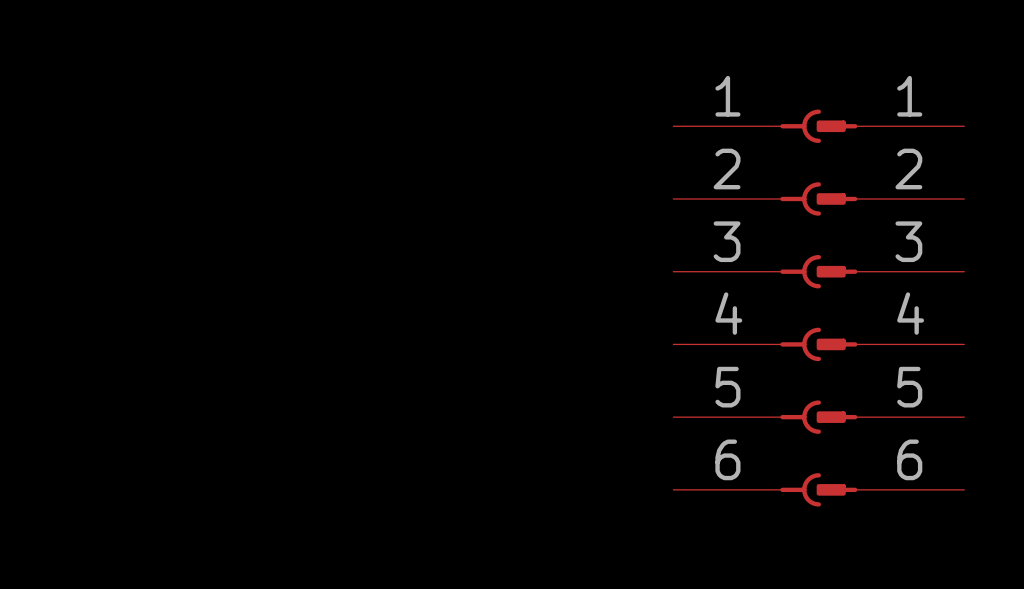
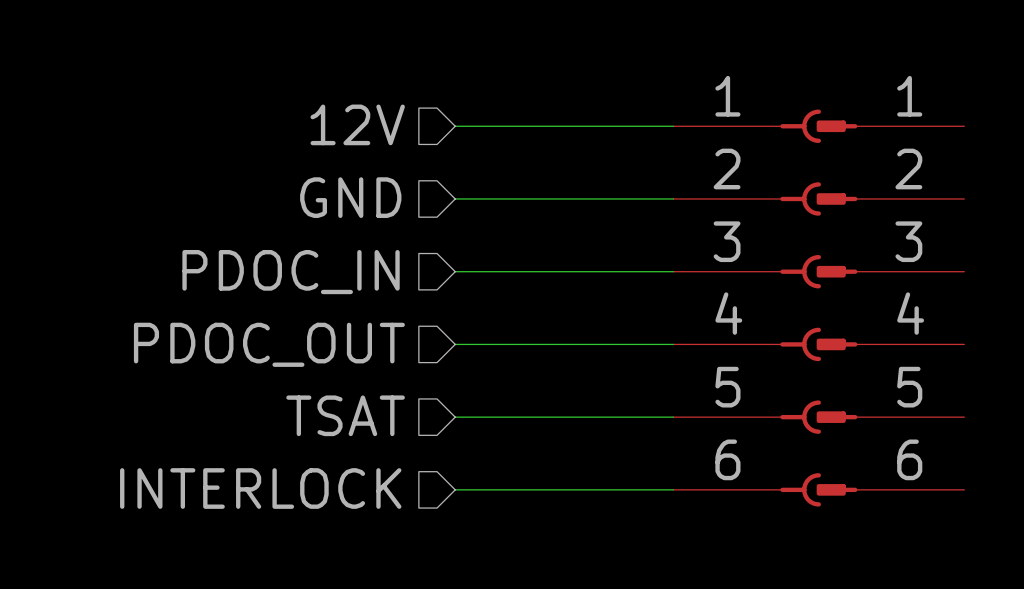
hierarchical label: none -> 12V (357, 124)
wire: none -> (455, 126) (673, 126)
hierarchical label: none -> GND (350, 197)
wire: none -> (455, 198) (673, 198)
wire: none -> (455, 271) (673, 271)
hierarchical label: none -> PDOC_IN (291, 272)
hierarchical label: none -> PDOC_OUT (269, 344)
wire: none -> (455, 344) (673, 344)
hierarchical label: none -> TSAT (345, 415)
wire: none -> (455, 417) (673, 417)
hierarchical label: none -> INTERLOCK (260, 488)
wire: none -> (455, 489) (673, 489)

